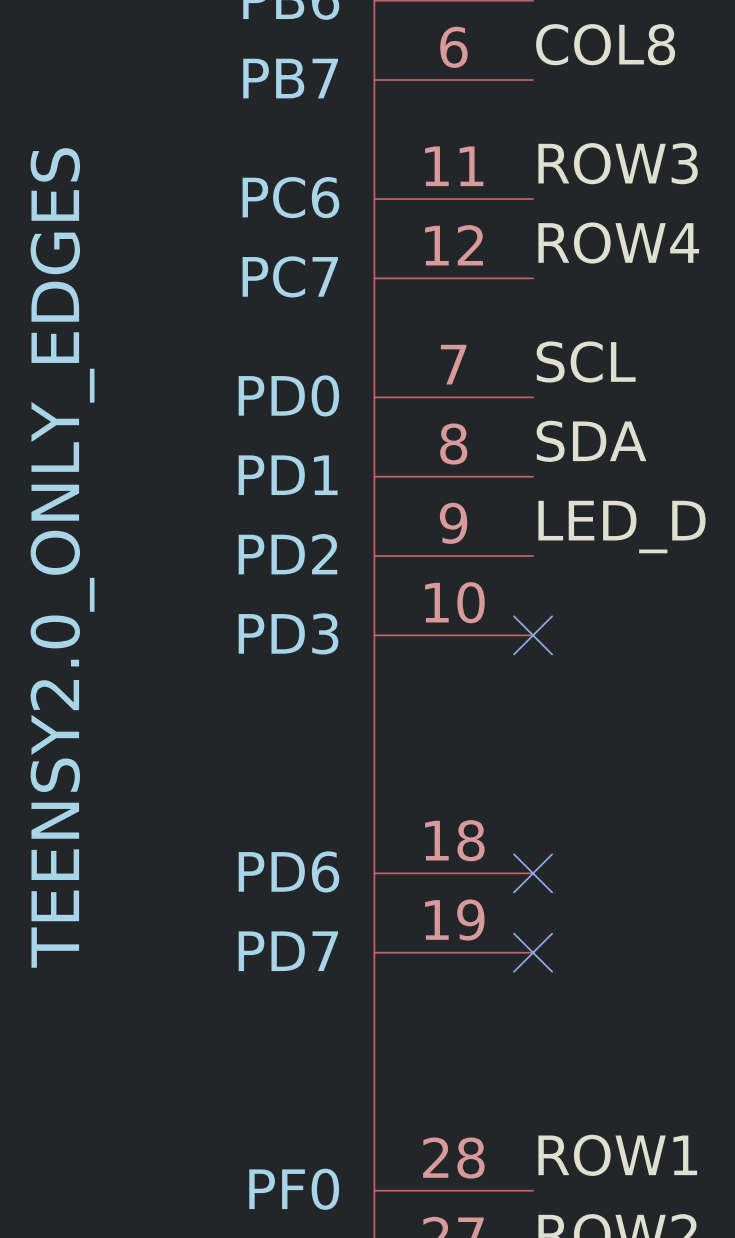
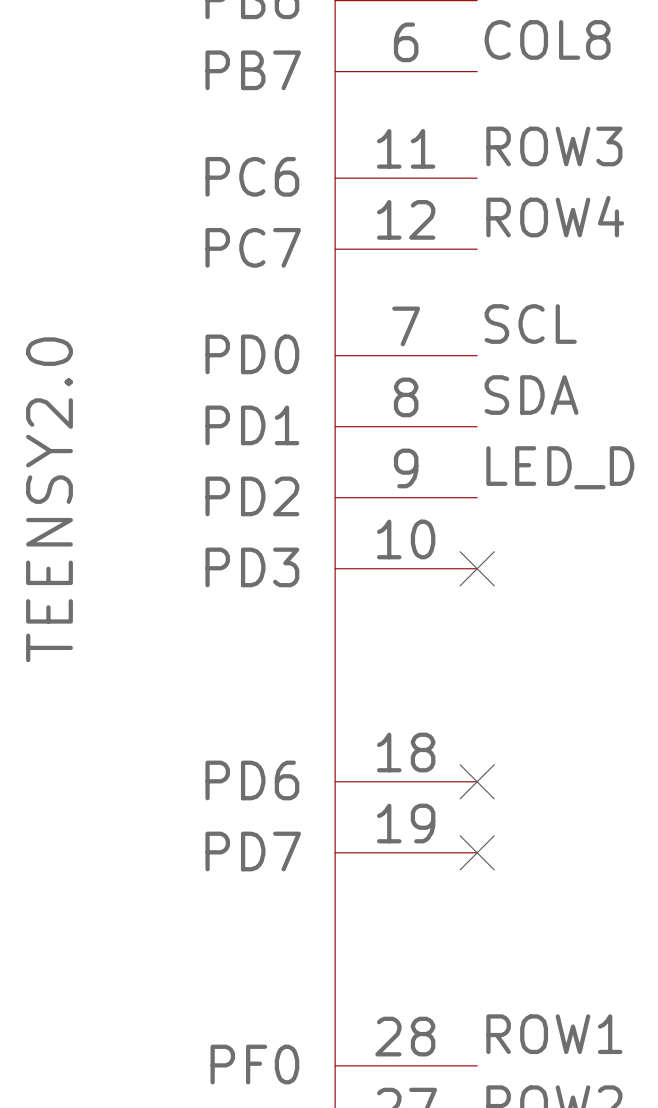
part value: TEENSY2.0_ONLY_EDGES (62, 557) -> TEENSY2.0 (49, 499)

